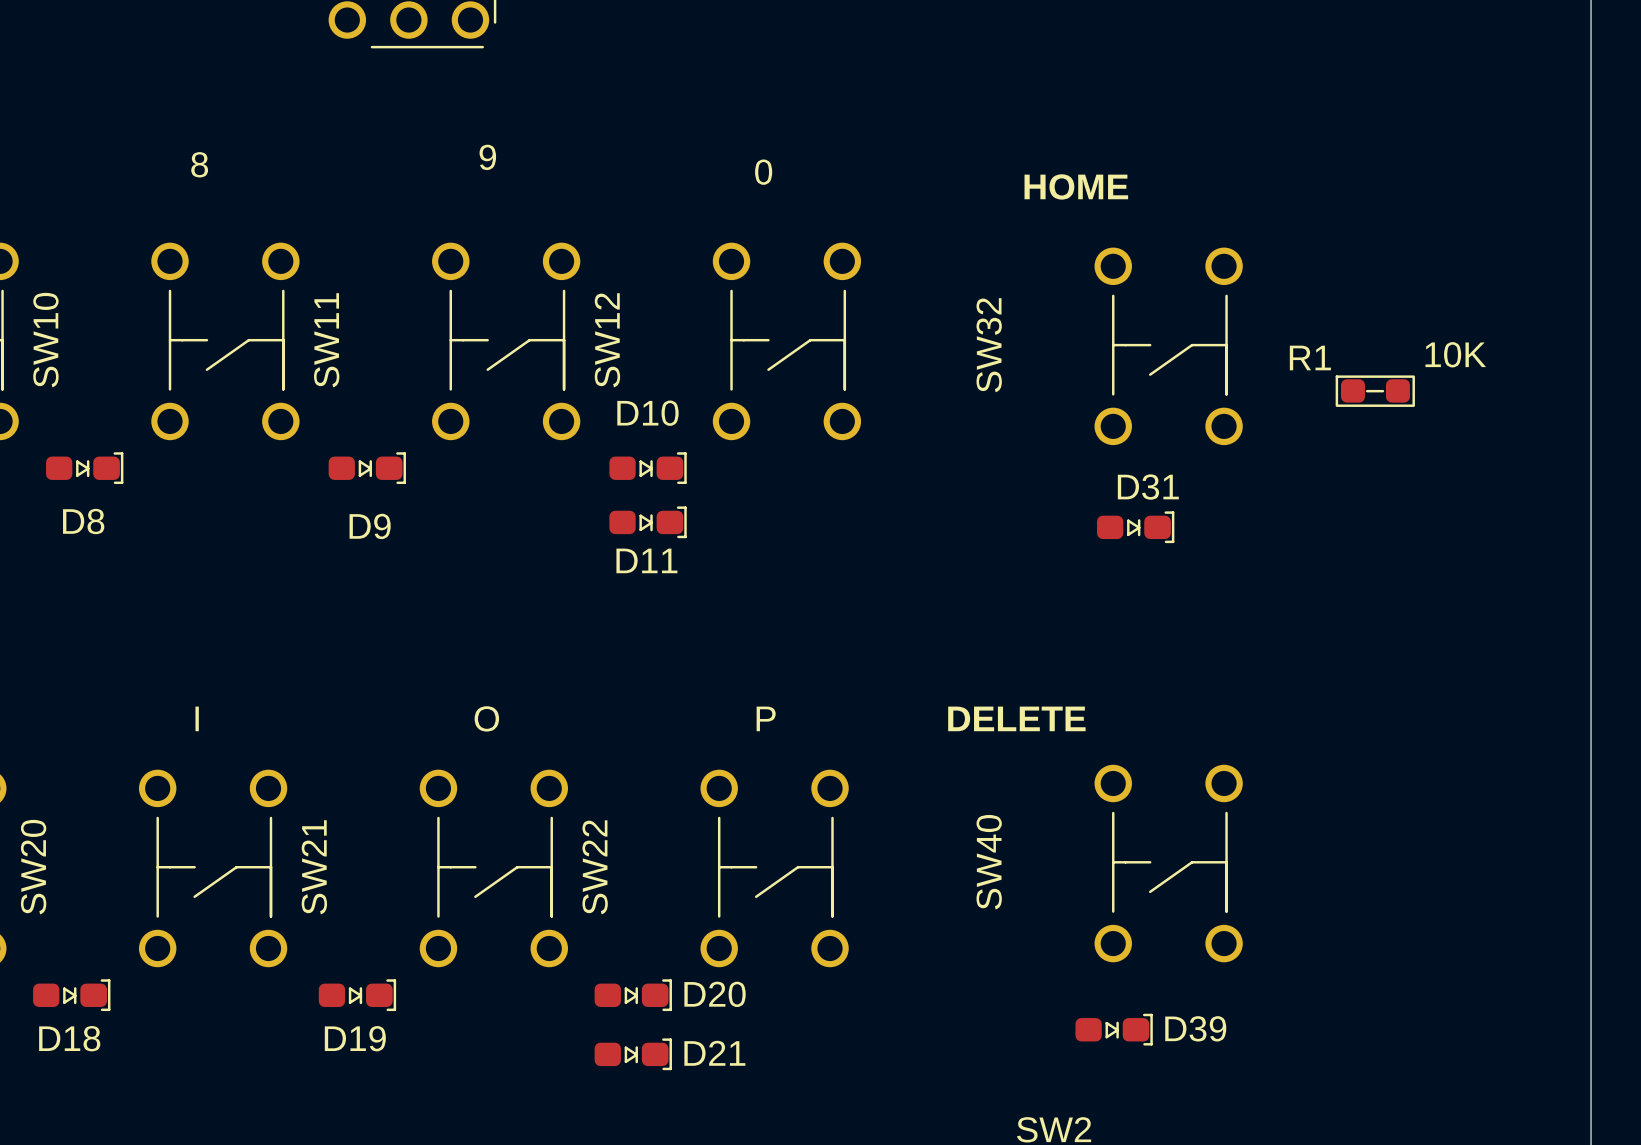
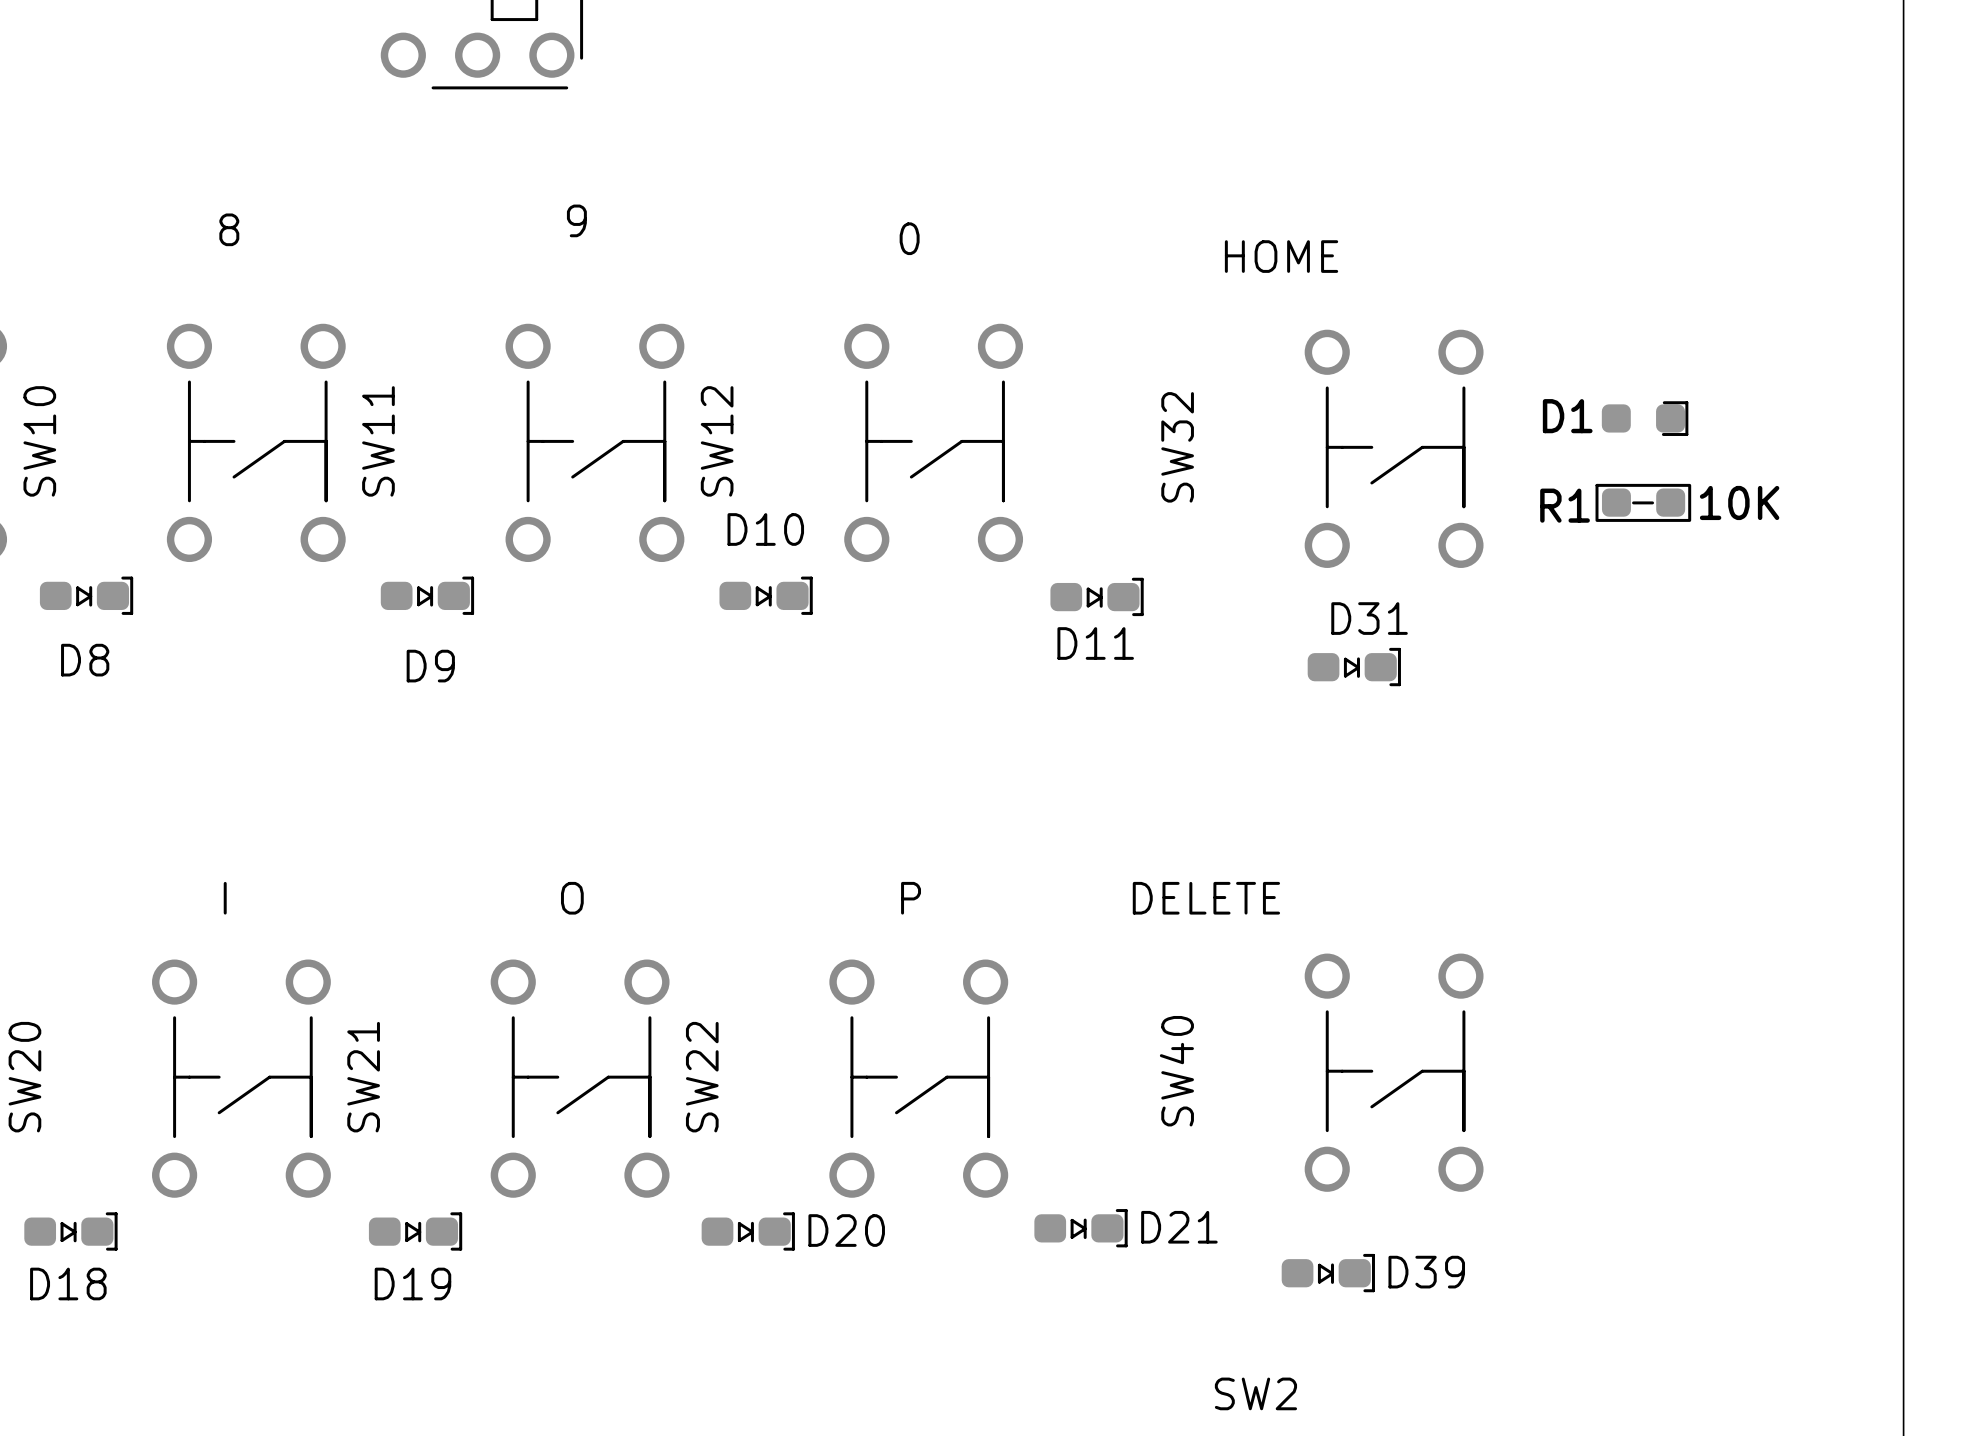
D1: none -> (1645, 418)
text position: 10K (1455, 354) -> 10K (1739, 502)
R1 name position: R1 (1310, 357) -> R1 (1565, 505)
D11 position: (648, 522) -> (1097, 596)
D21 position: (633, 1054) -> (1081, 1228)

